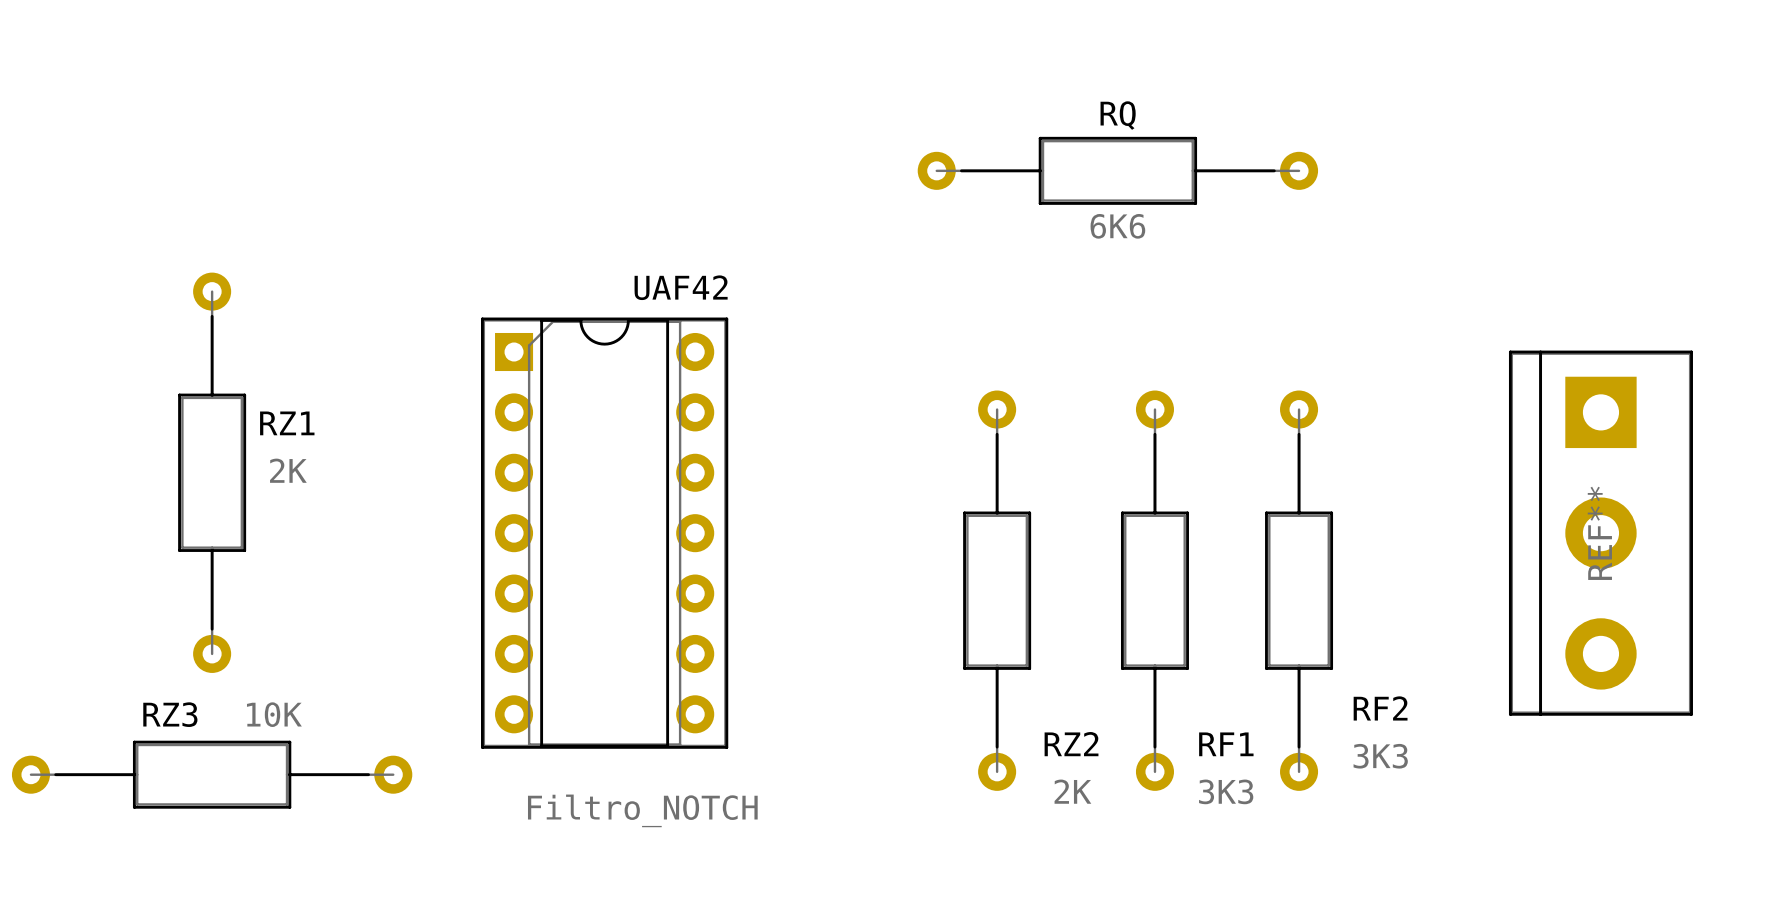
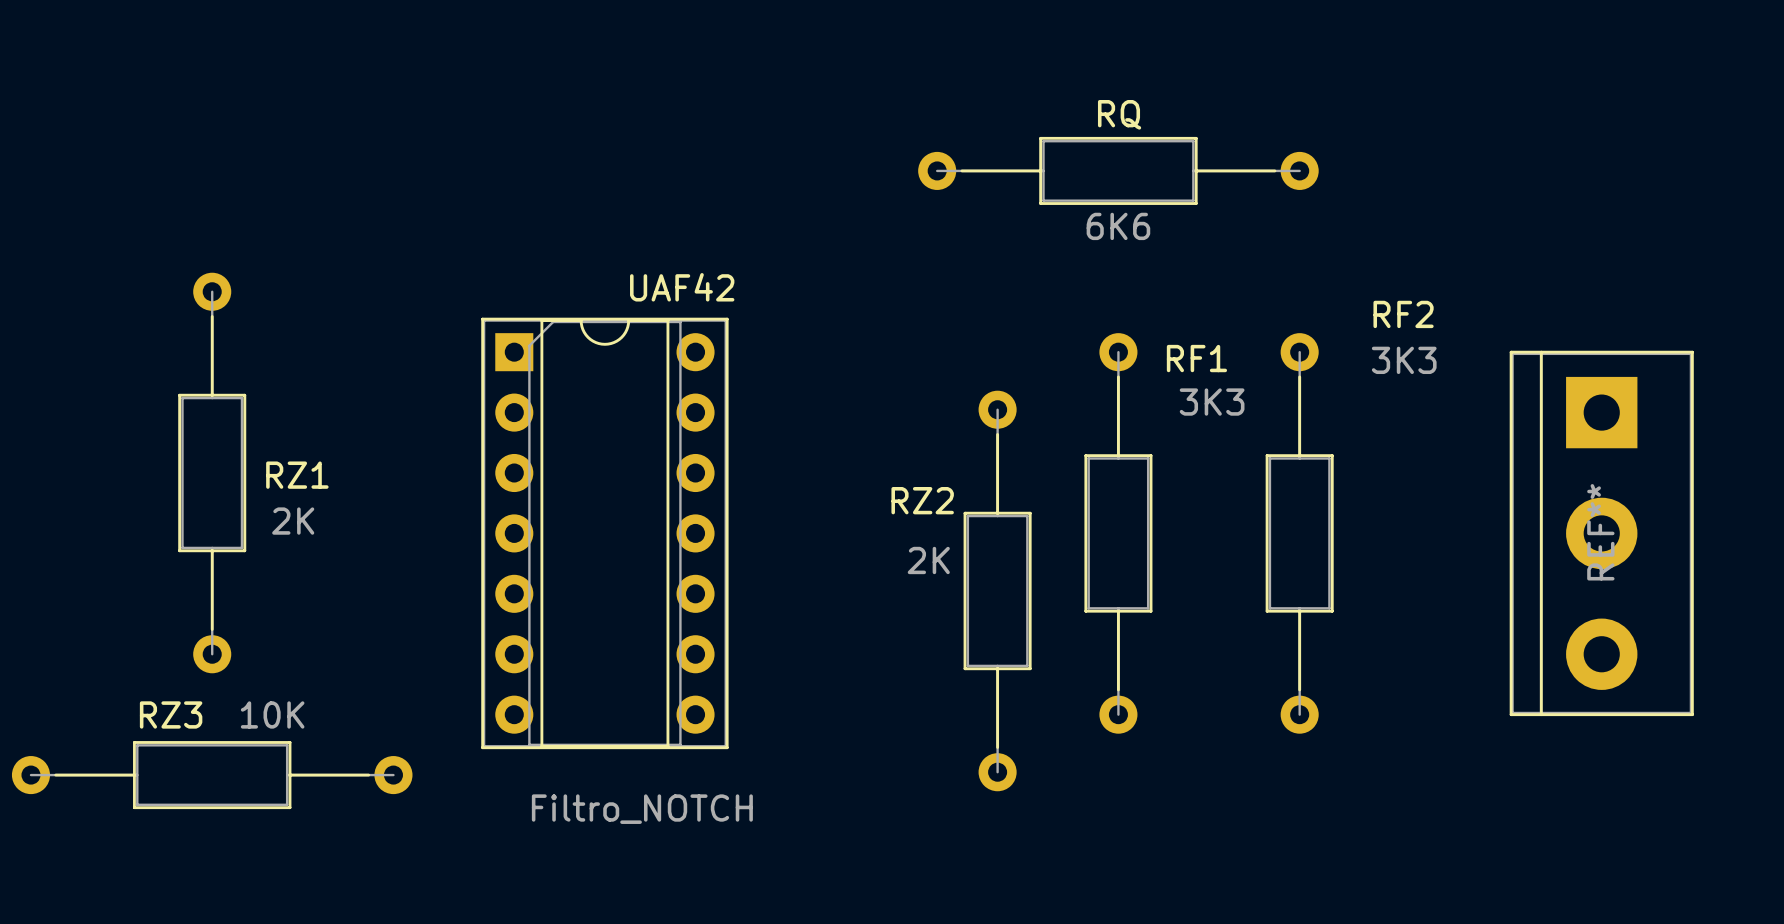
RZ1 name position: RZ1 (287, 423) -> RZ1 (297, 475)
RZ1 value position: 2K (288, 470) -> 2K (293, 521)
RF1 position: (1154, 590) -> (1118, 533)
RF2 position: (1299, 590) -> (1299, 533)
RF2 name position: RF2 (1380, 708) -> RF2 (1403, 314)
RZ2 name position: RZ2 (1071, 744) -> RZ2 (922, 500)
RF1 name position: RF1 (1226, 744) -> RF1 (1196, 358)
RF2 value position: 3K3 (1380, 756) -> 3K3 (1404, 360)
RZ2 value position: 2K (1072, 791) -> 2K (928, 560)
RF1 value position: 3K3 (1226, 791) -> 3K3 (1212, 402)

